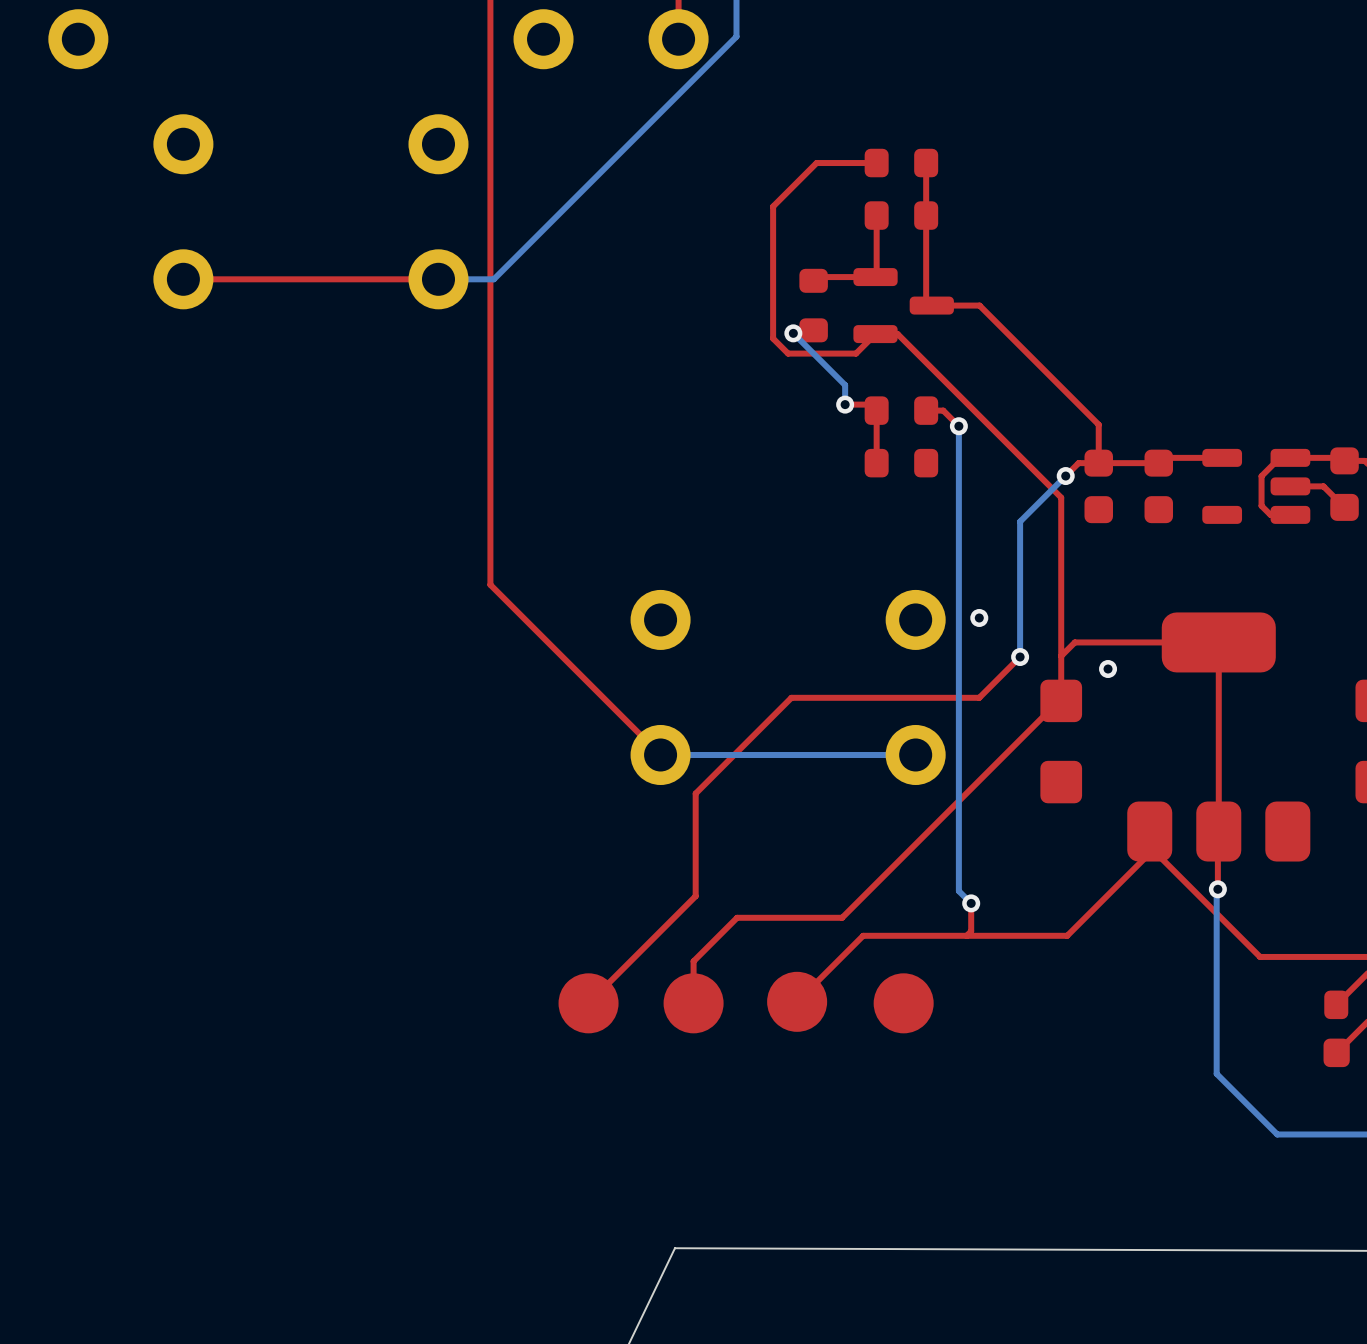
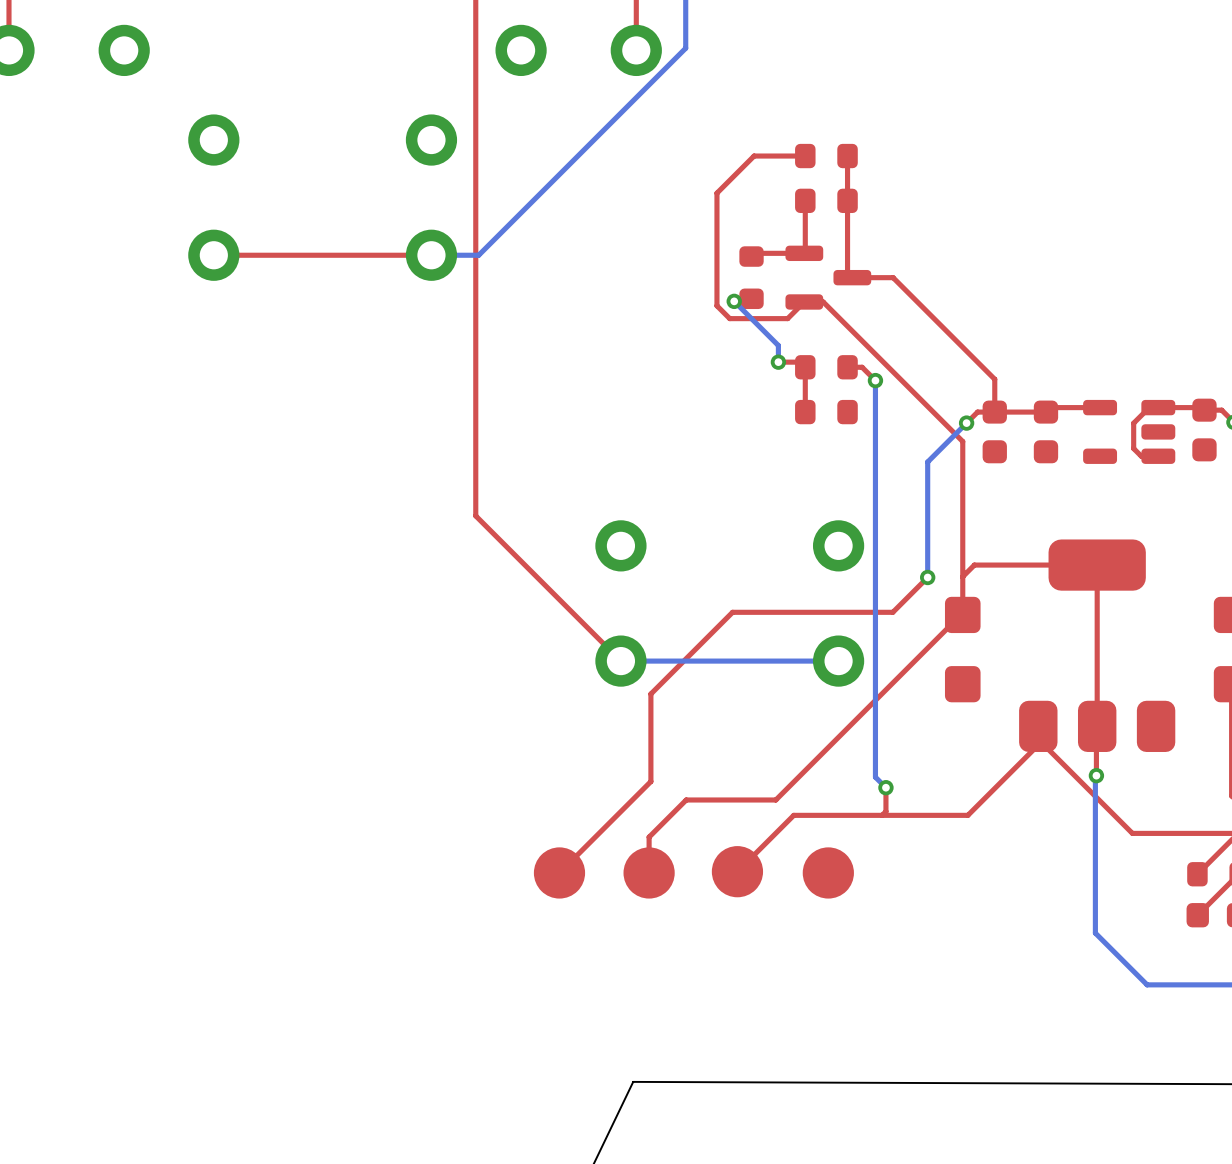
top track: (1290, 486) (1323, 486) (1344, 507) -> none
via: (979, 617) -> none
via: (1108, 669) -> none

